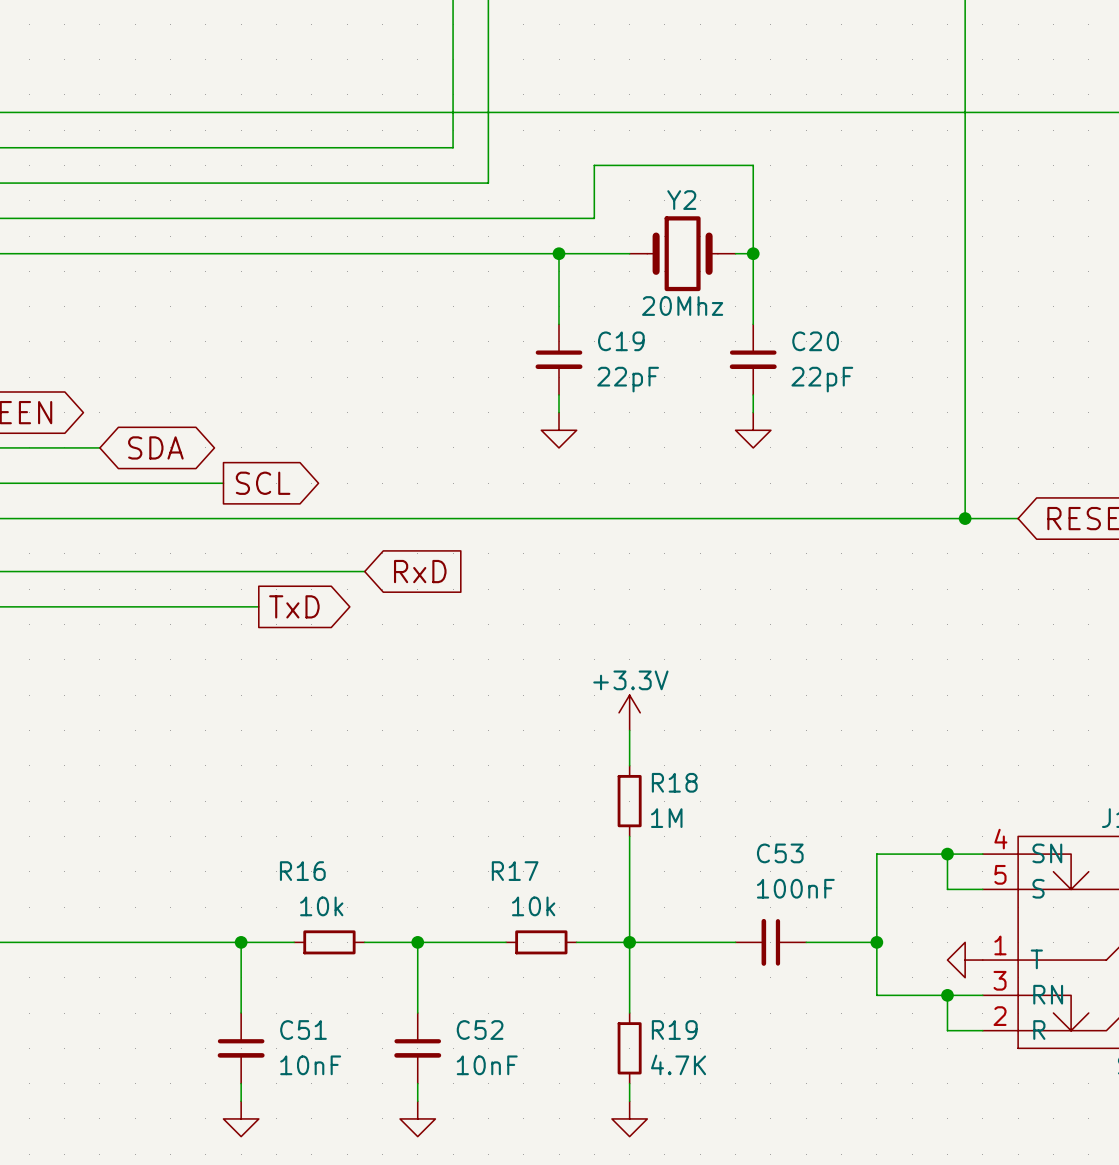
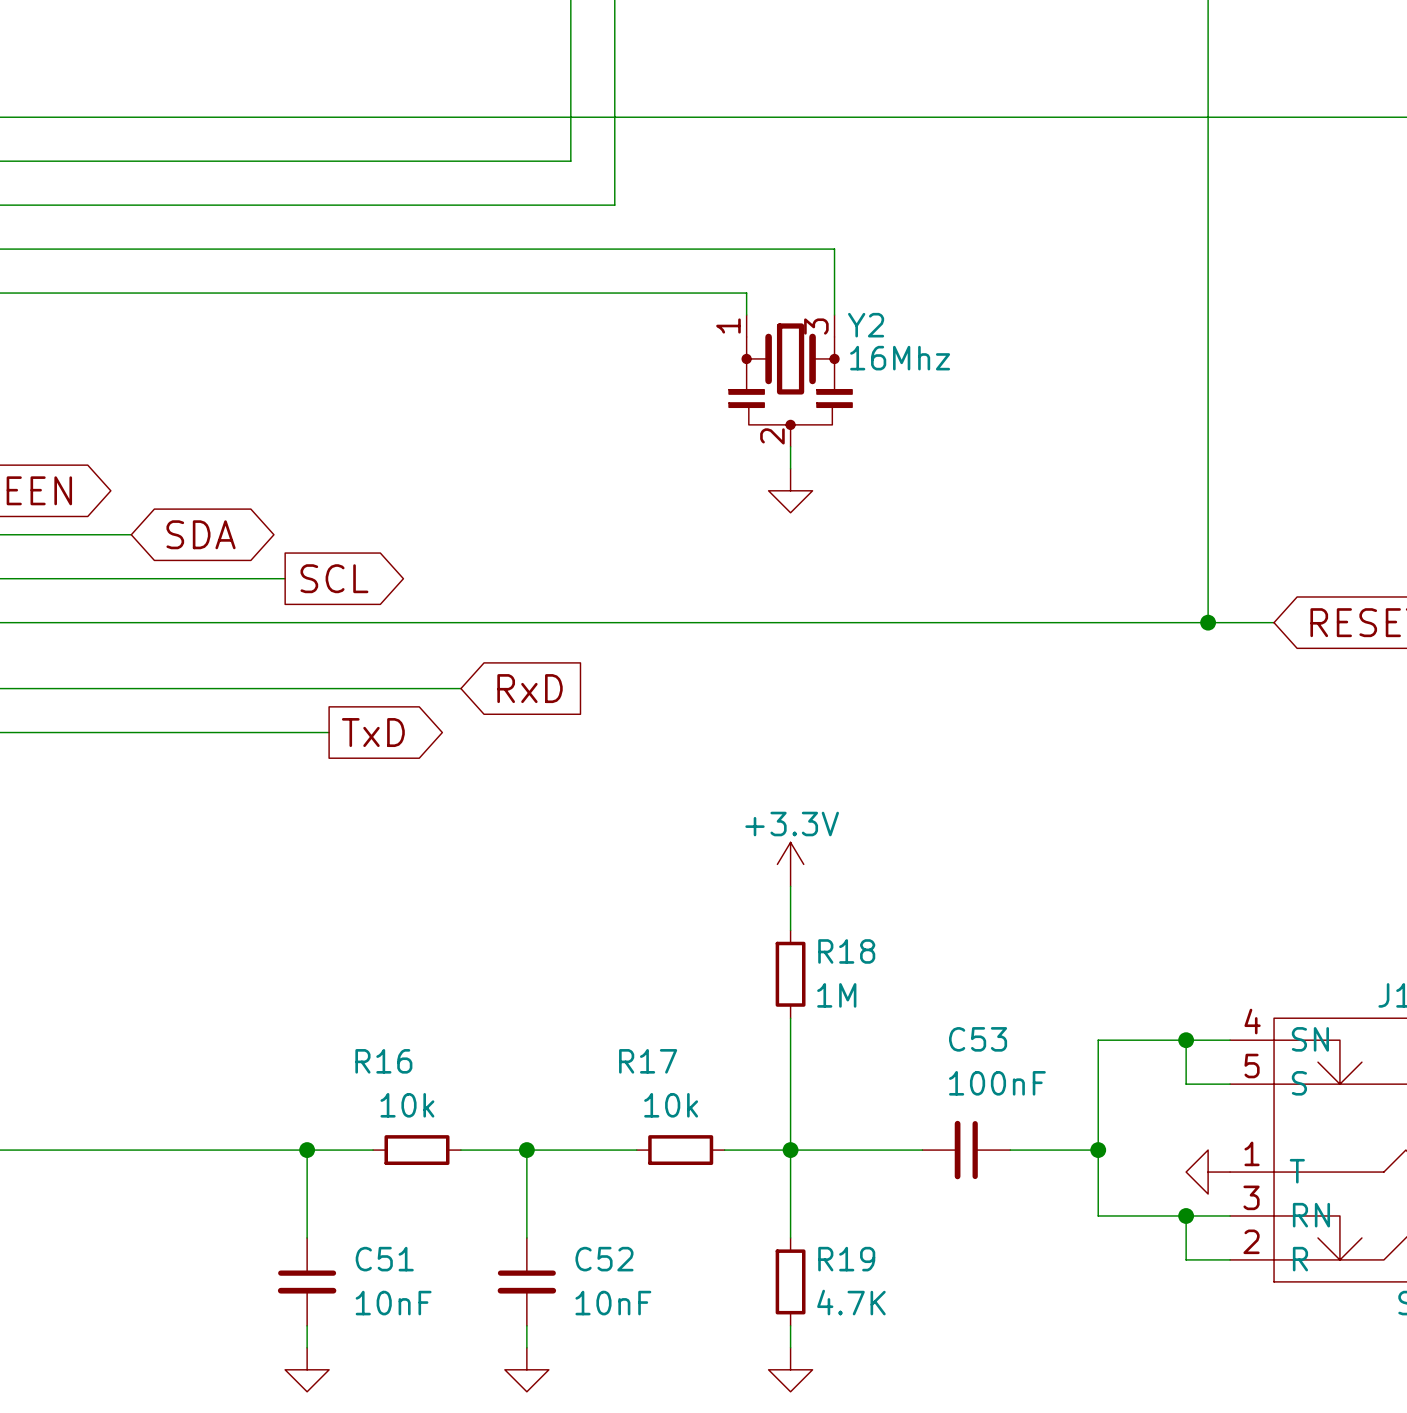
Y2 name position: Y2 (681, 200) -> Y2 (866, 325)
Y2 symbol: [629, 216, 736, 292] -> [729, 315, 853, 447]
wire: (594, 218) (594, 165) (753, 165) (753, 324) -> (746, 249) (834, 249) (834, 315)
wire: (559, 253) (559, 324) -> none
junction: (559, 253) -> none
wire: (594, 253) (629, 253) -> (746, 293) (746, 315)
wire: (735, 253) (753, 253) -> none
junction: (753, 253) -> none
Y2 value: 20Mhz (682, 306) -> 16Mhz (900, 358)
C19: 22pF (559, 359) -> none
C20: 22pF (753, 359) -> none
wire: (559, 394) (559, 412) -> (790, 446) (790, 468)
wire: (753, 394) (753, 412) -> none
power symbol: none -> (790, 490)
power symbol: (559, 430) -> none
power symbol: (753, 430) -> none

